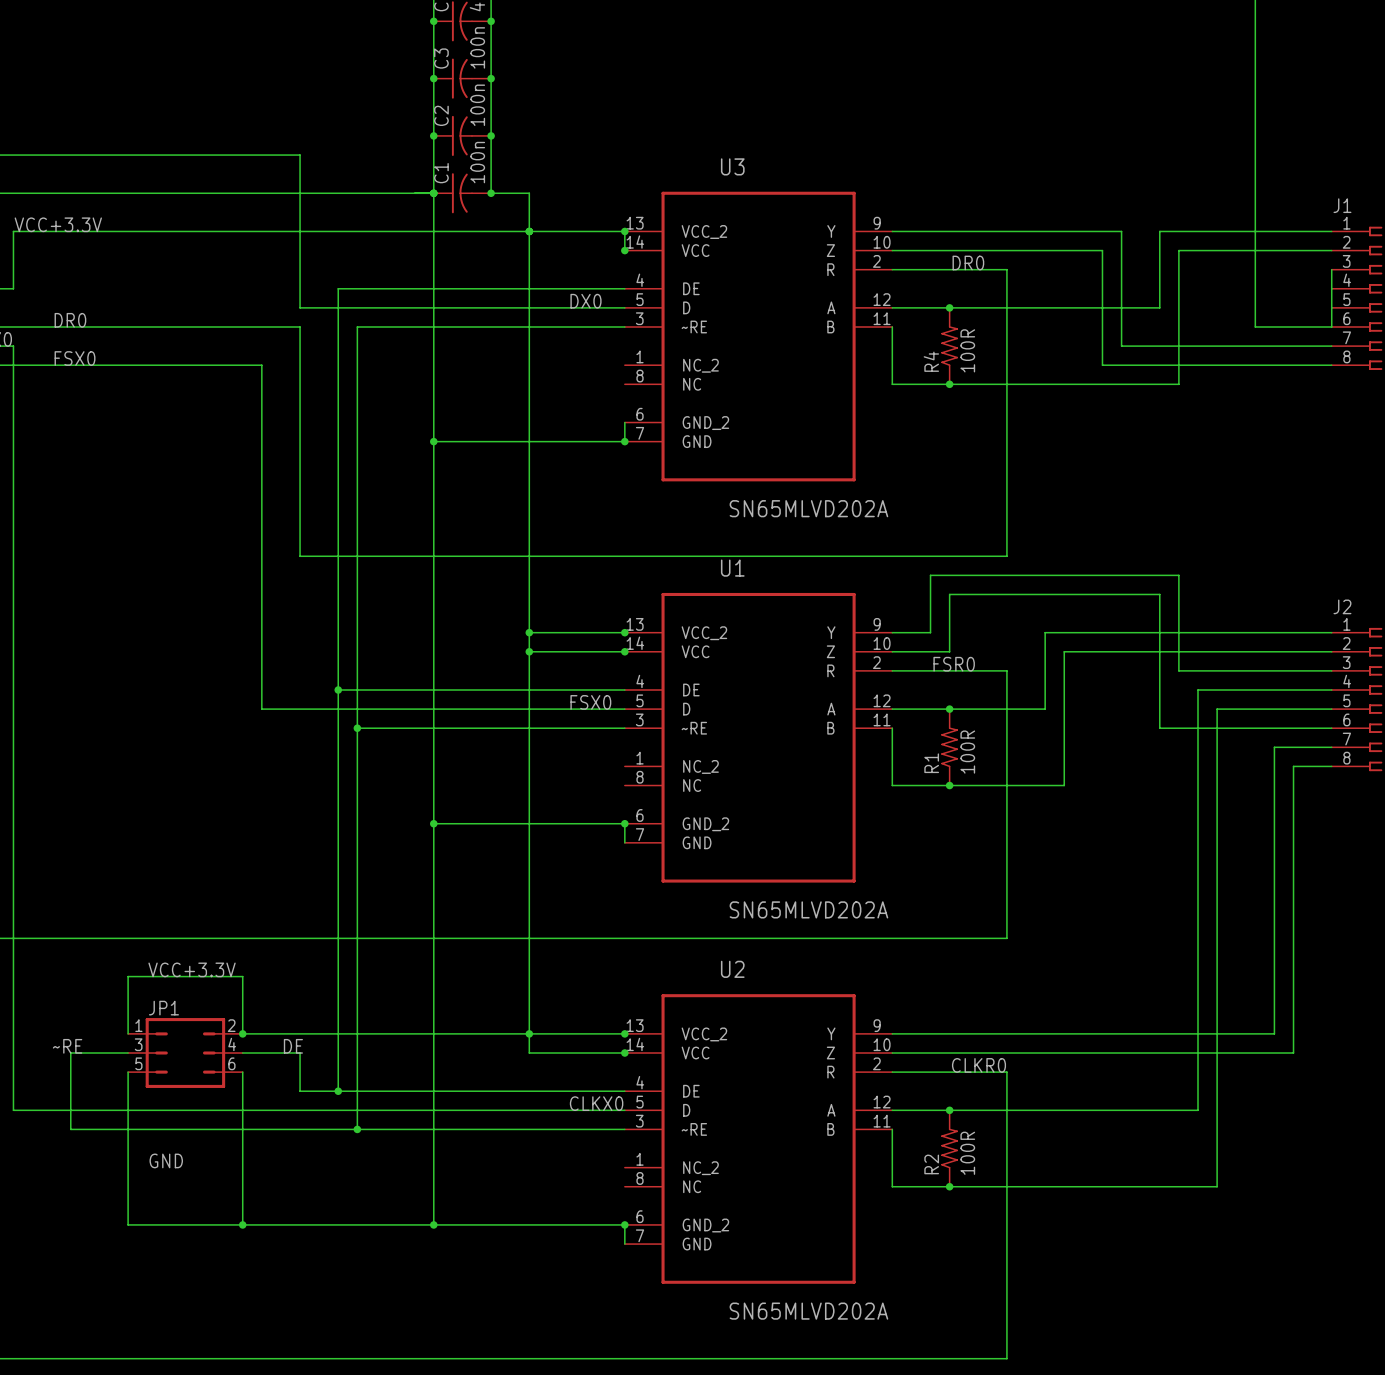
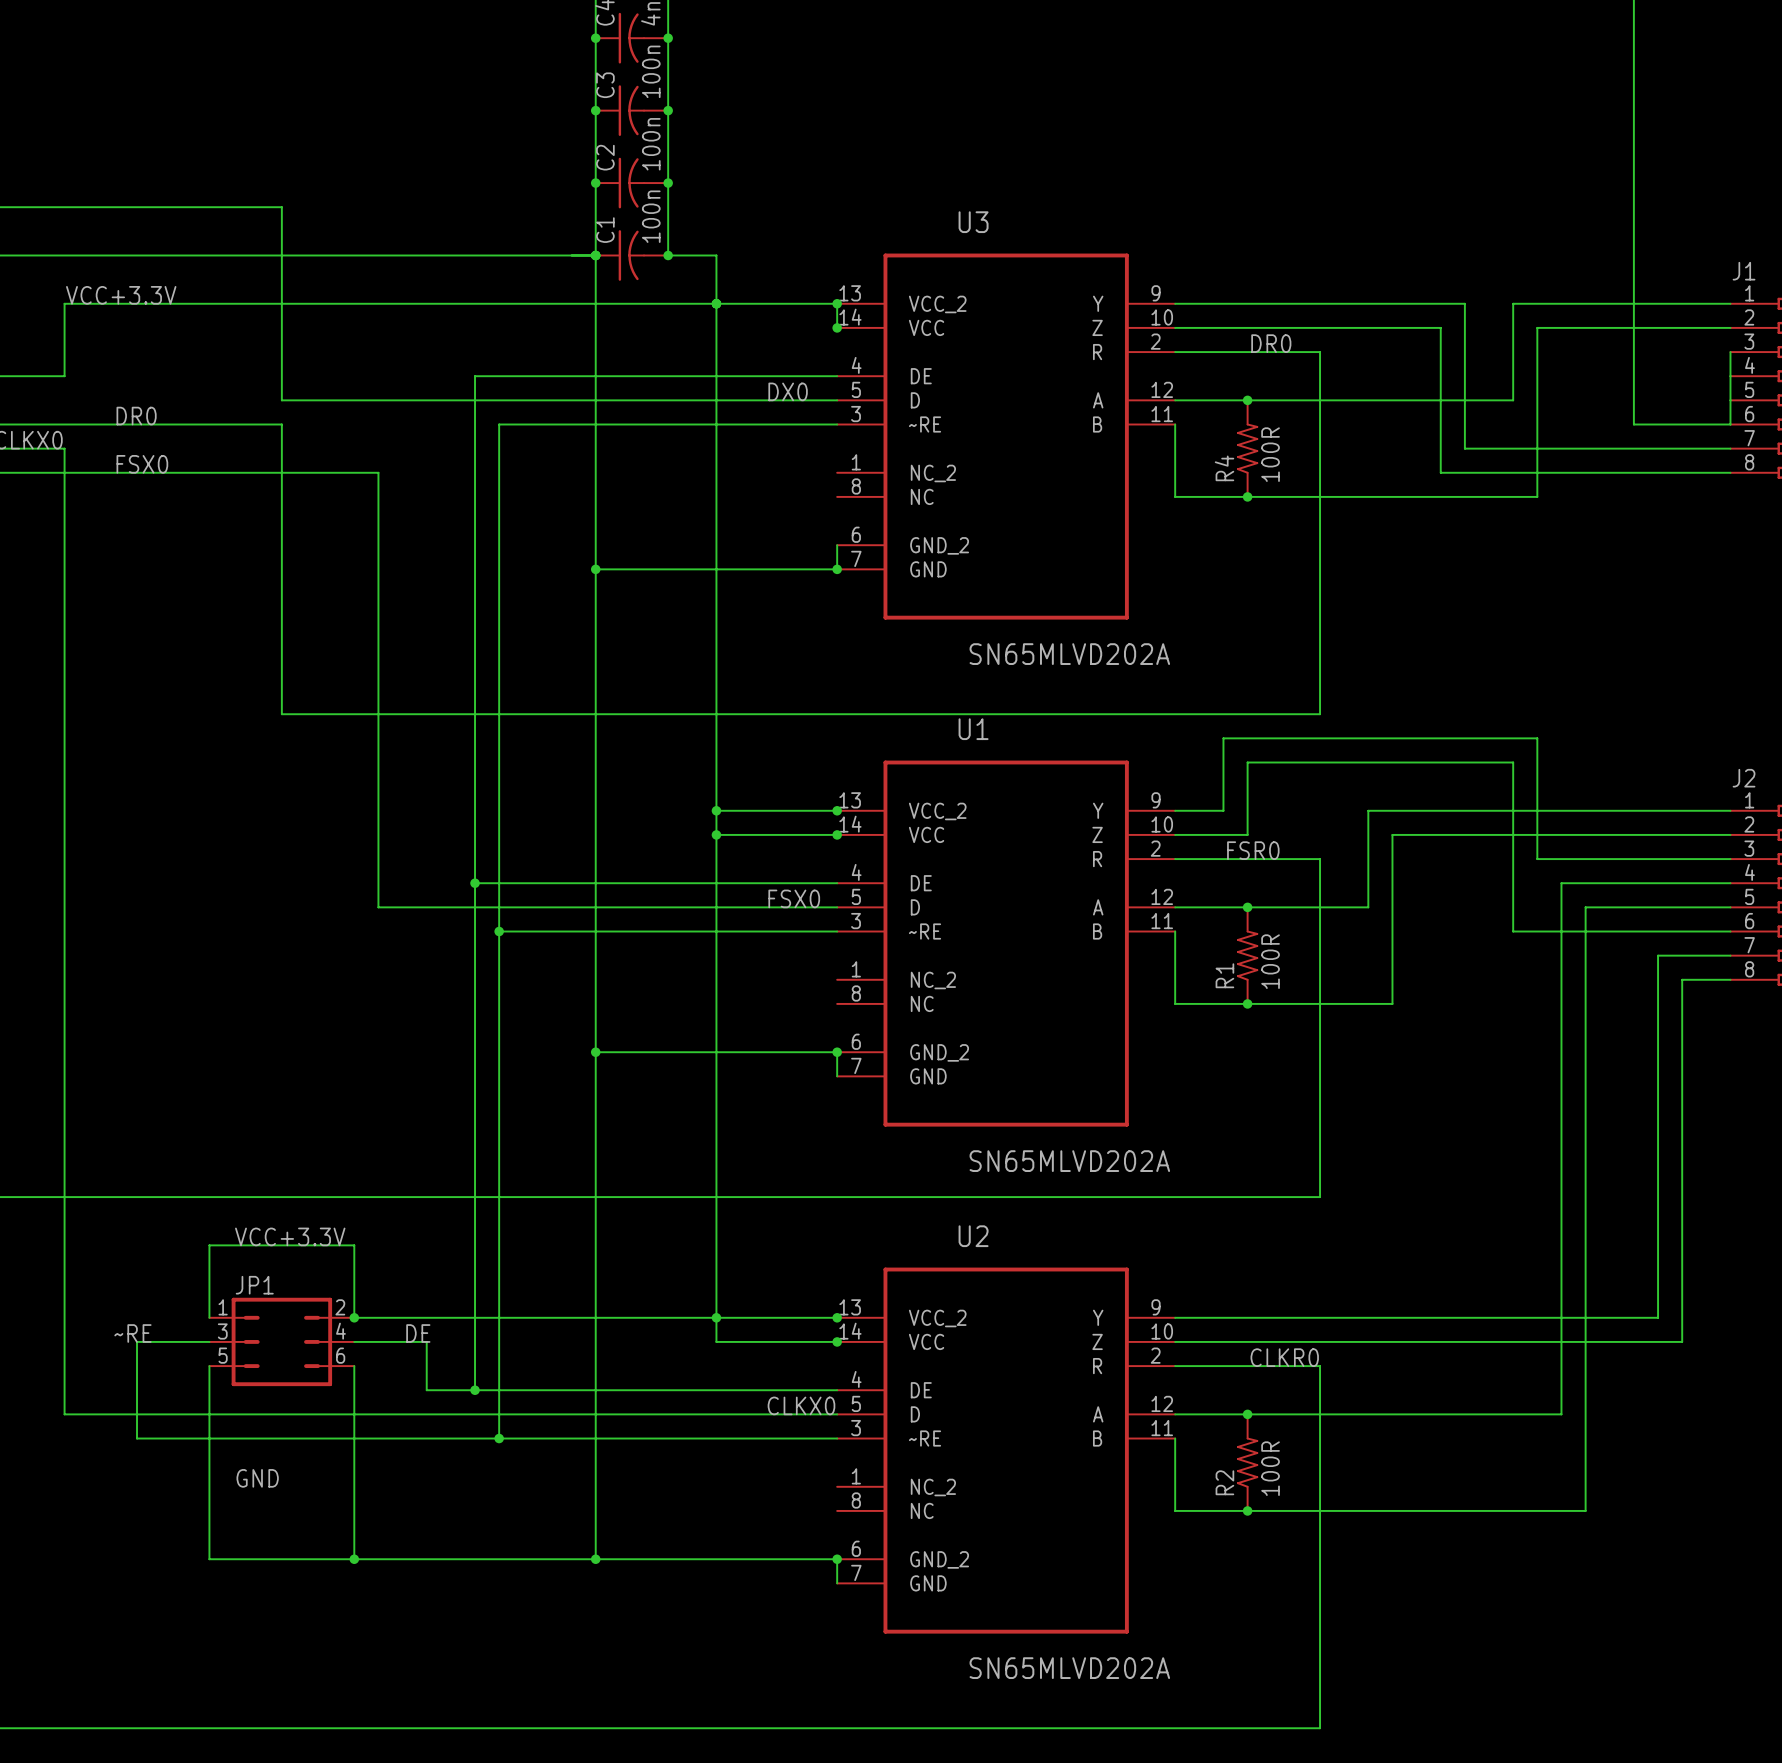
wire: (185, 155) (300, 155) (300, 307) -> (281, 207) (281, 400) (426, 400)
wire: (185, 326) (300, 326) (300, 556) -> (281, 424) (281, 714) (426, 714)

